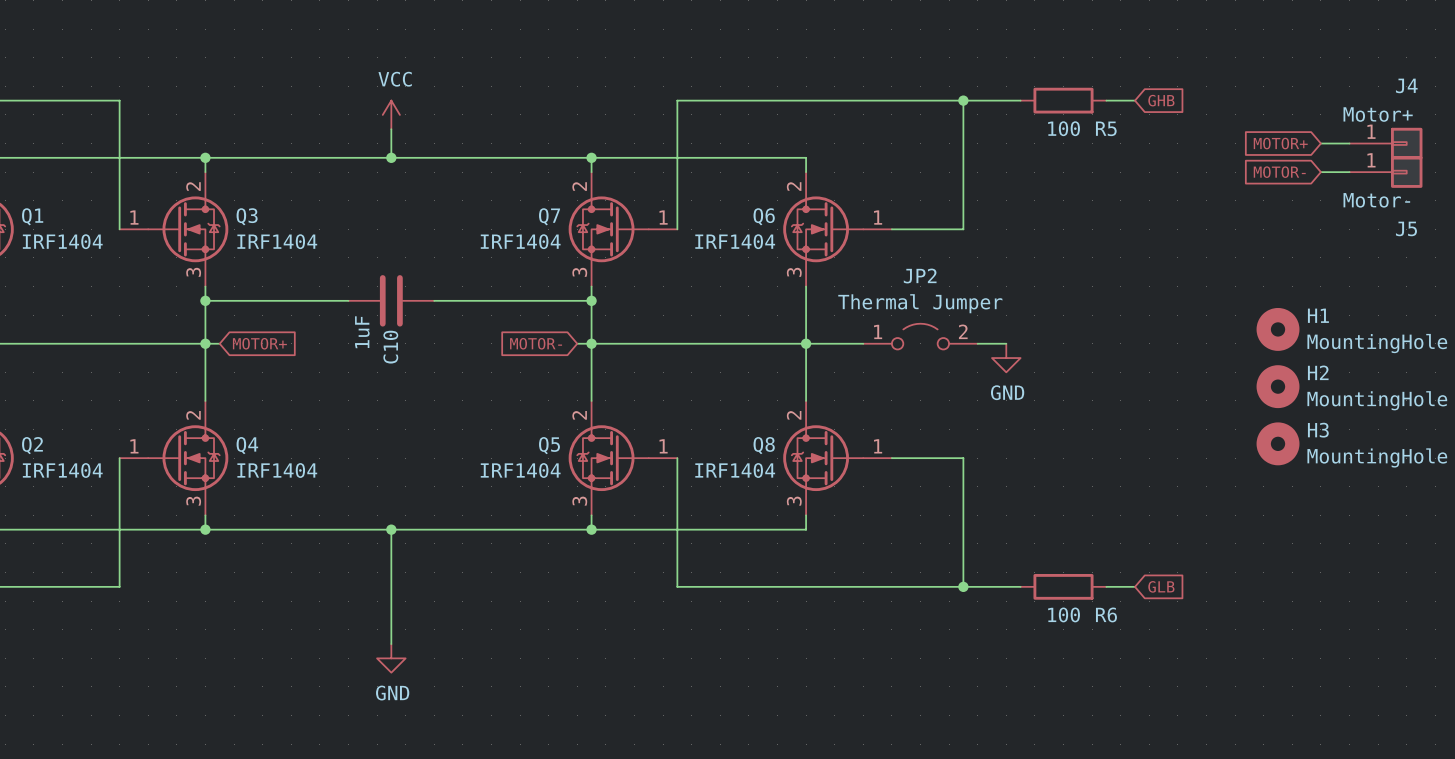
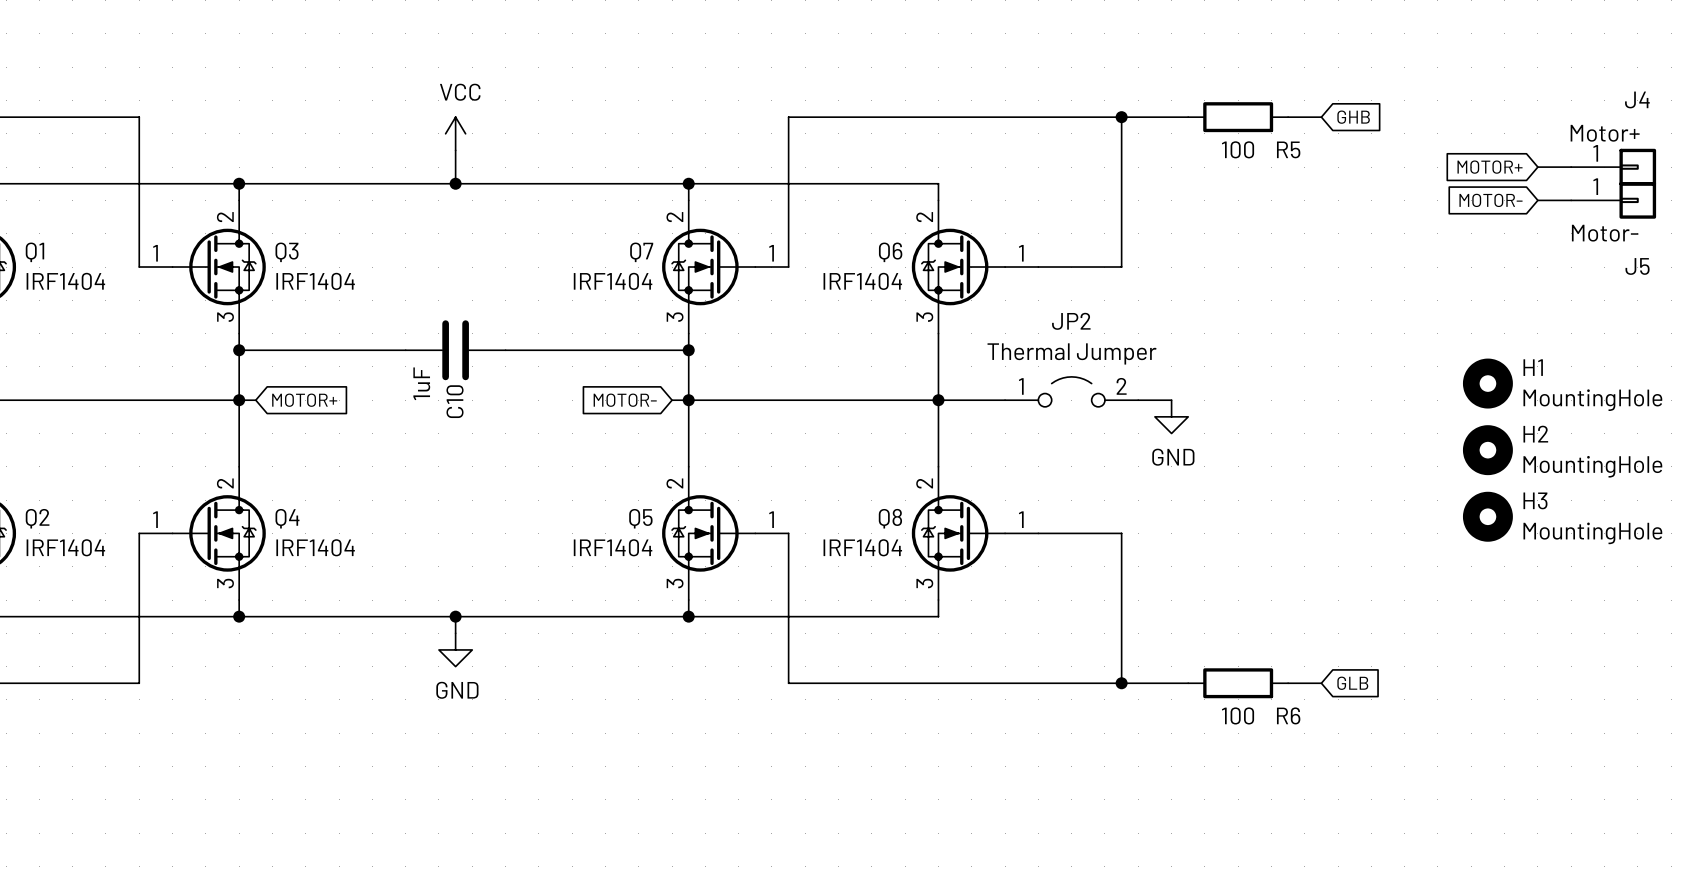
wire: (391, 543) (391, 644) -> none
power symbol position: GND (391, 658) -> GND (455, 649)

